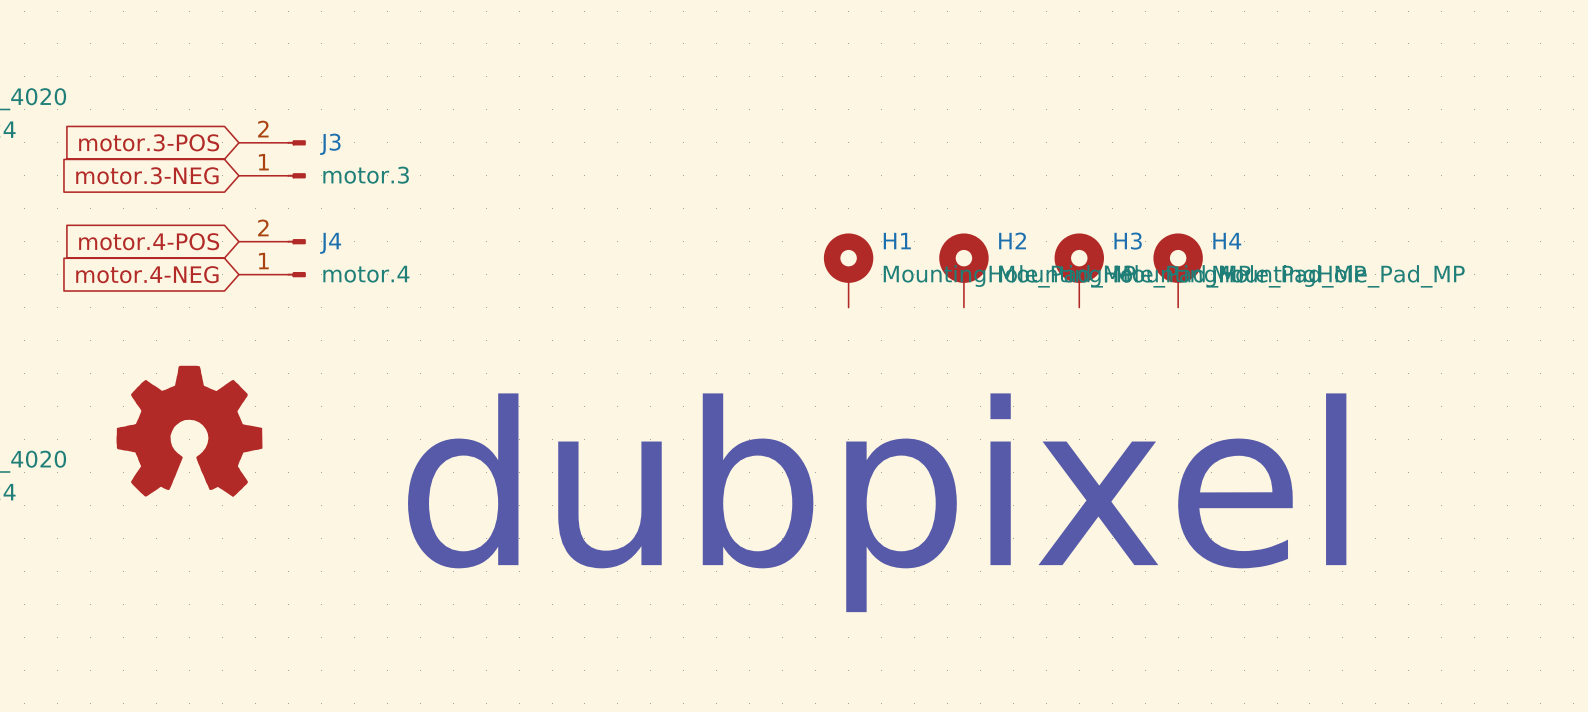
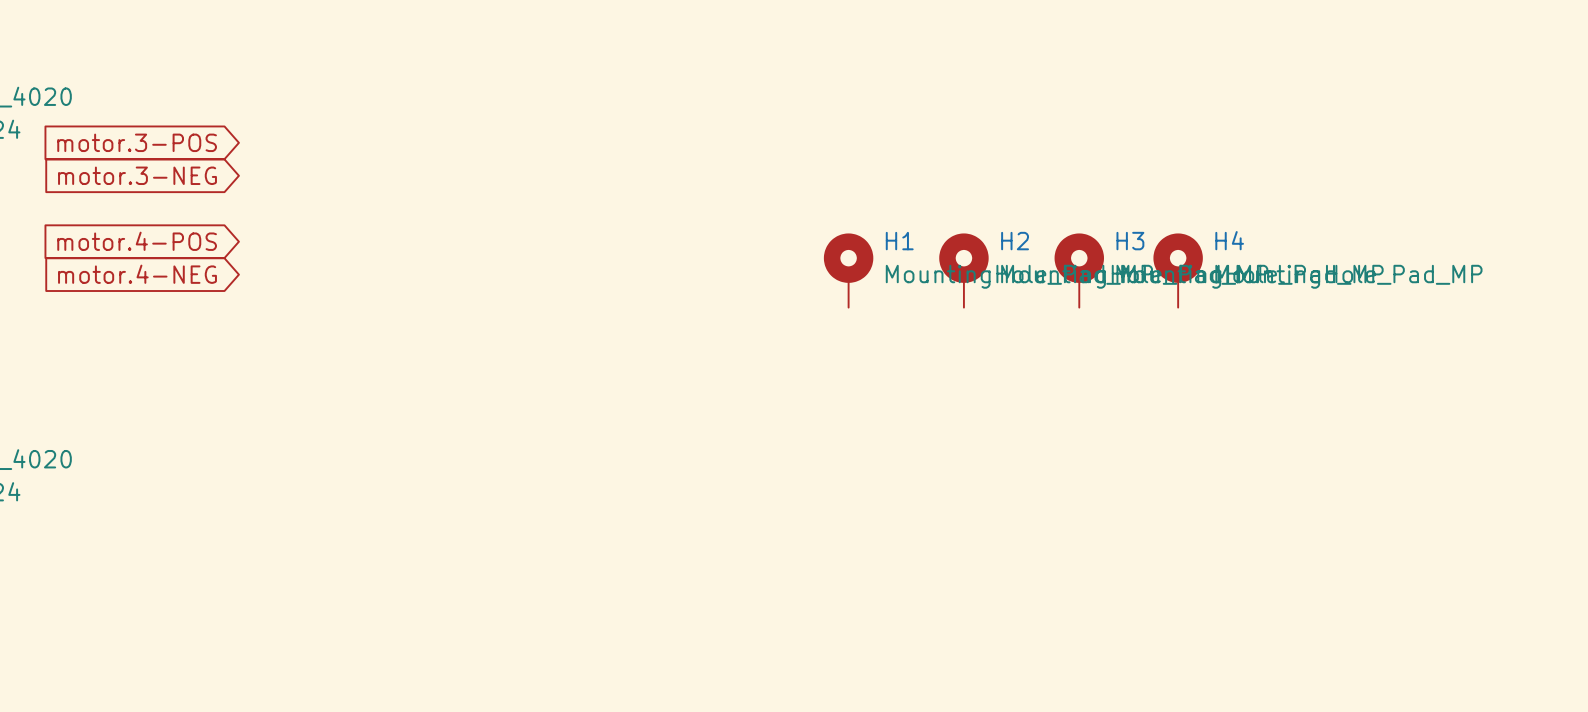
J3: motor.3 (272, 159) -> none
J4: motor.4 (272, 258) -> none
part: (189, 431) -> none
text: dubpixel (877, 502) -> none

